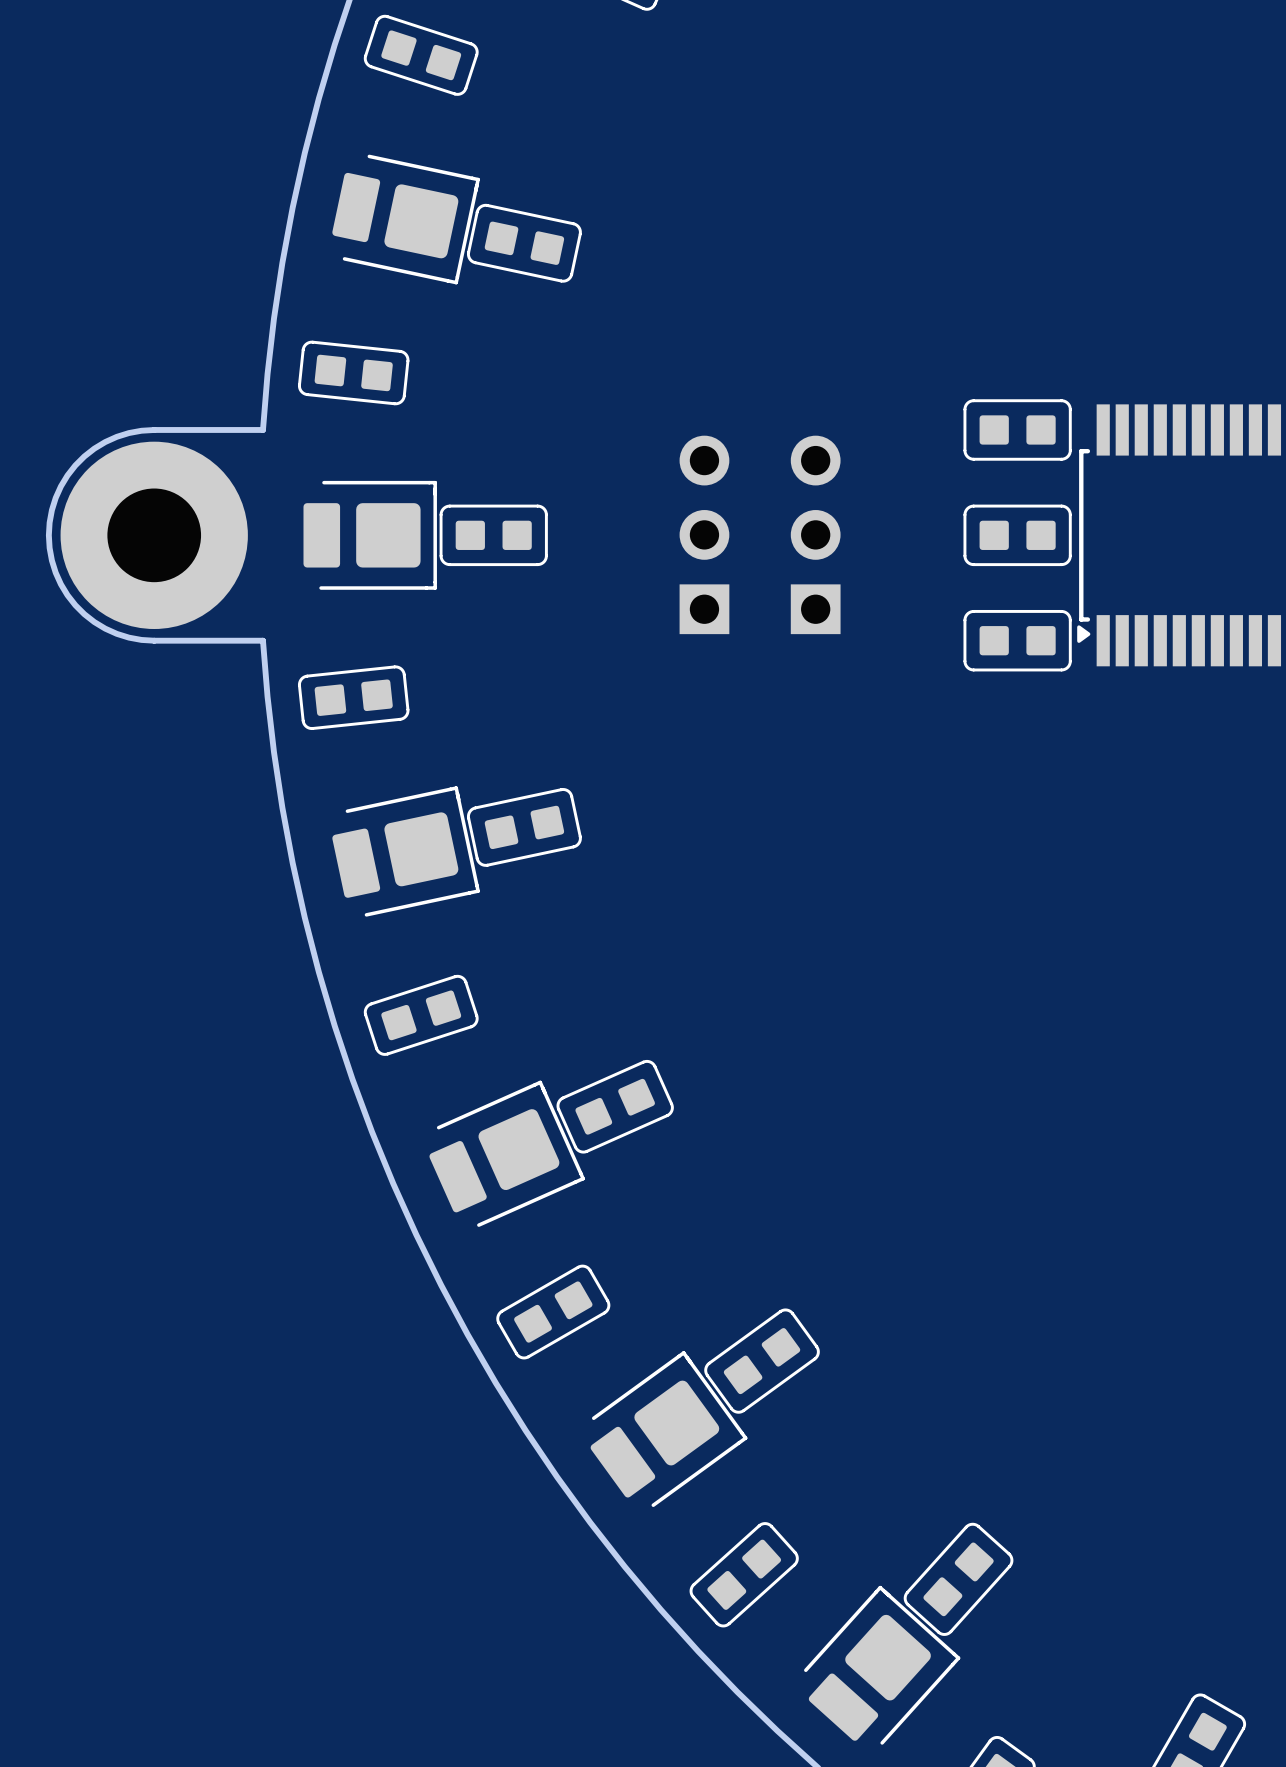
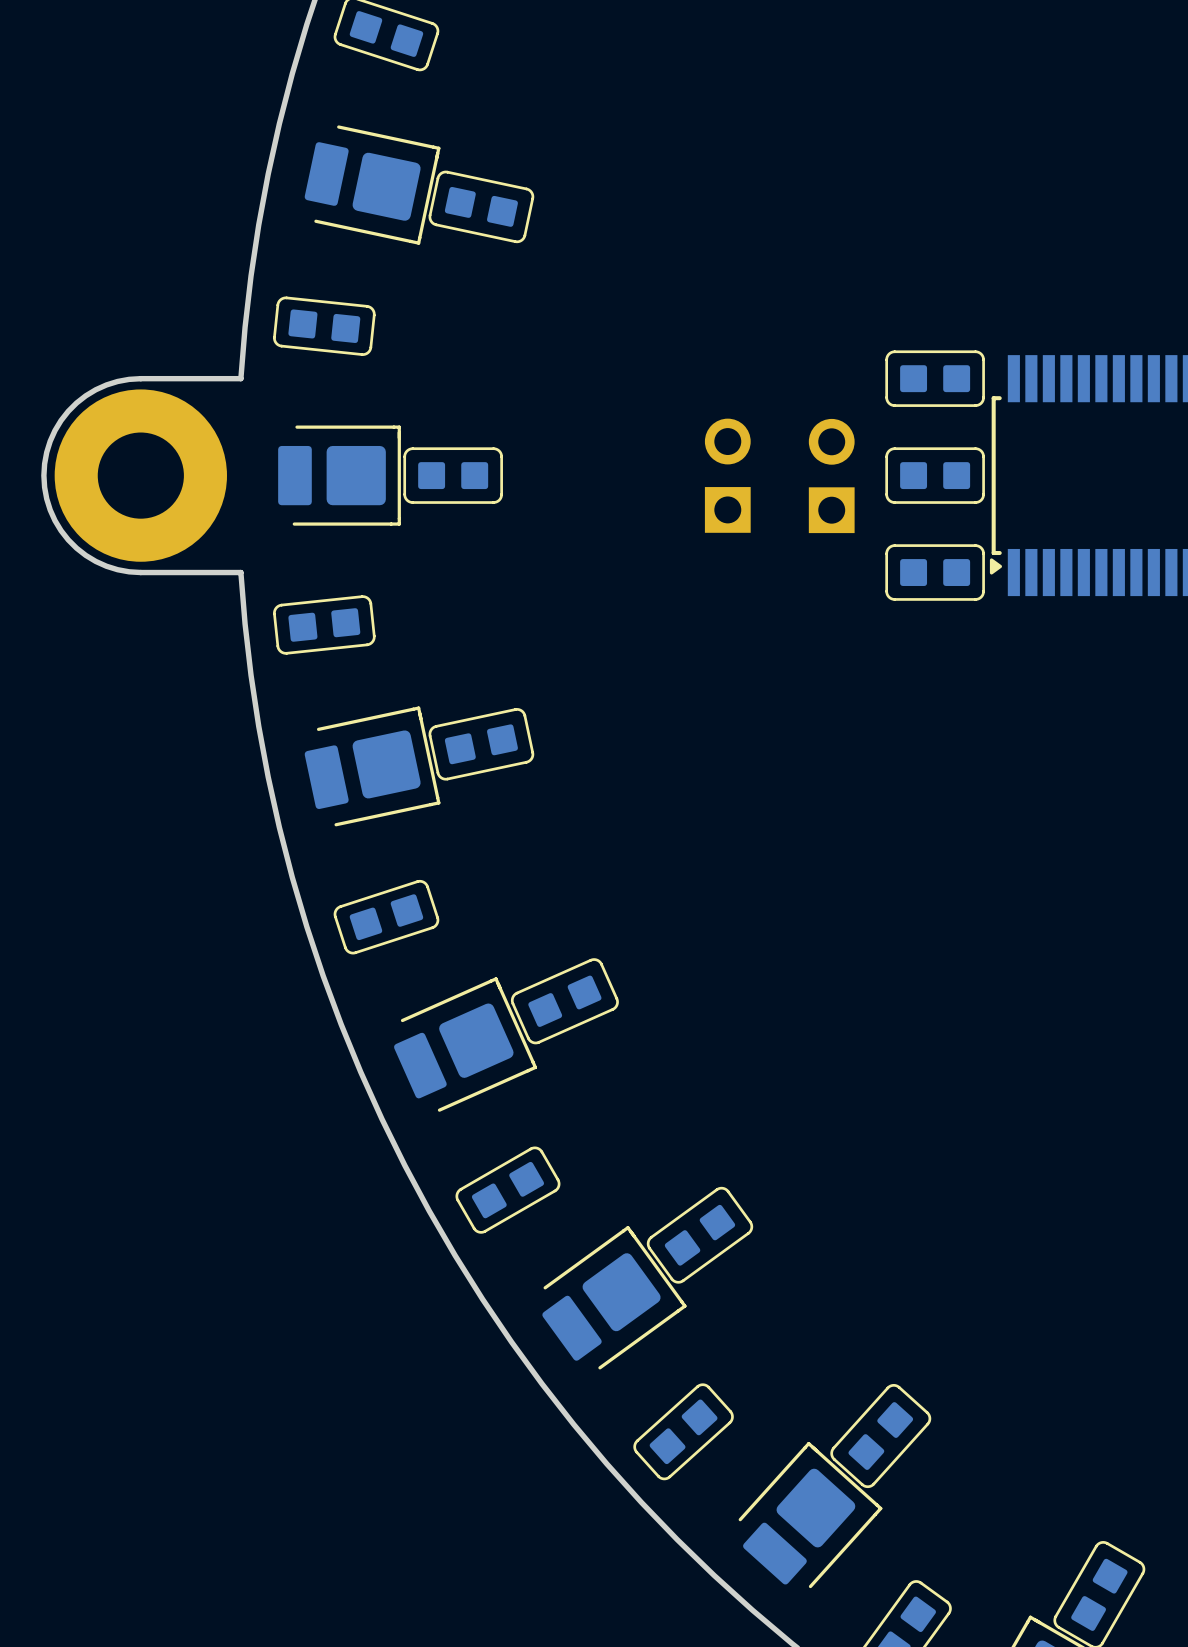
part footprint: [790, 435, 841, 635] -> [704, 418, 751, 533]
part: (704, 534) -> none
part: none -> (831, 476)

